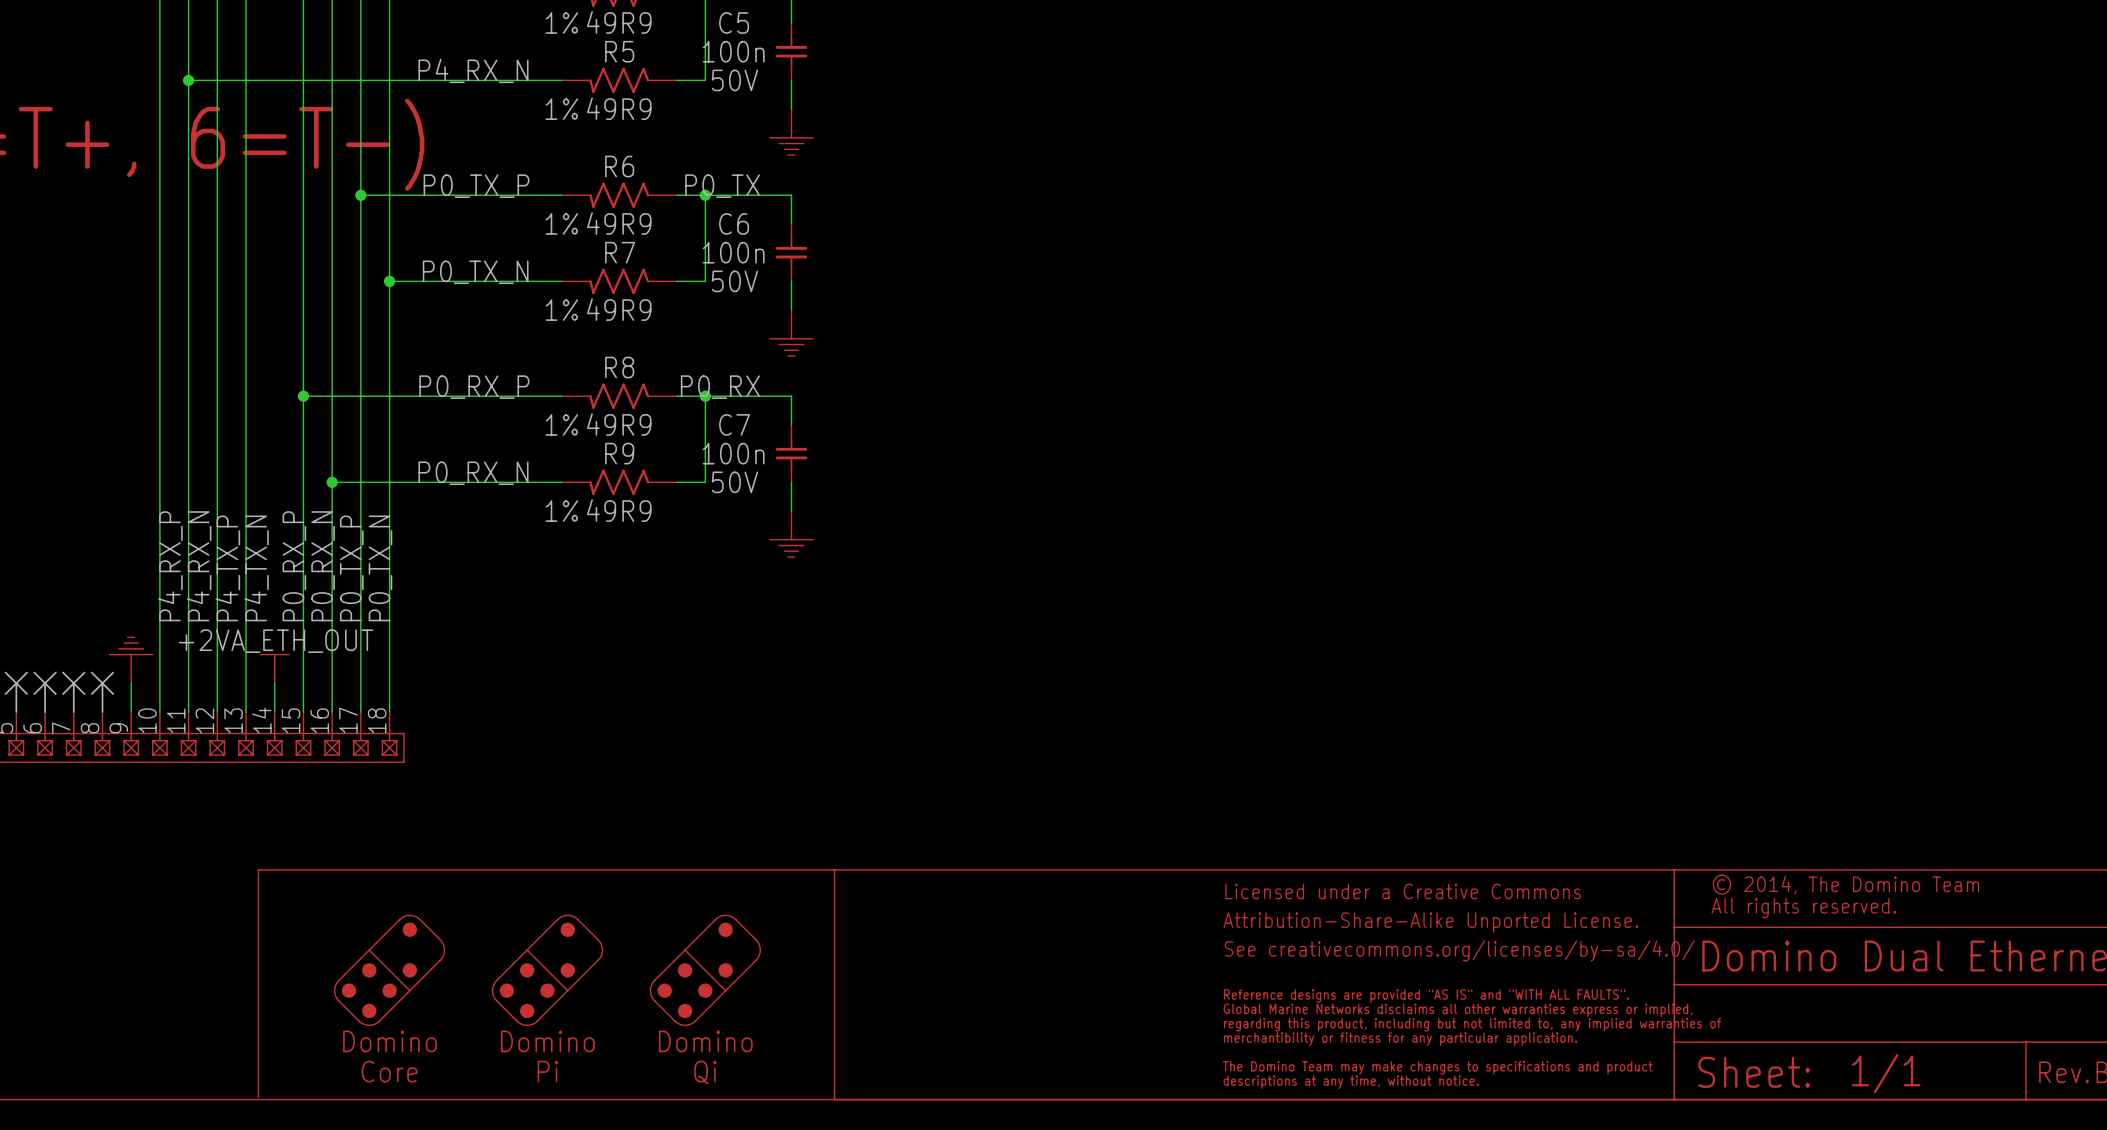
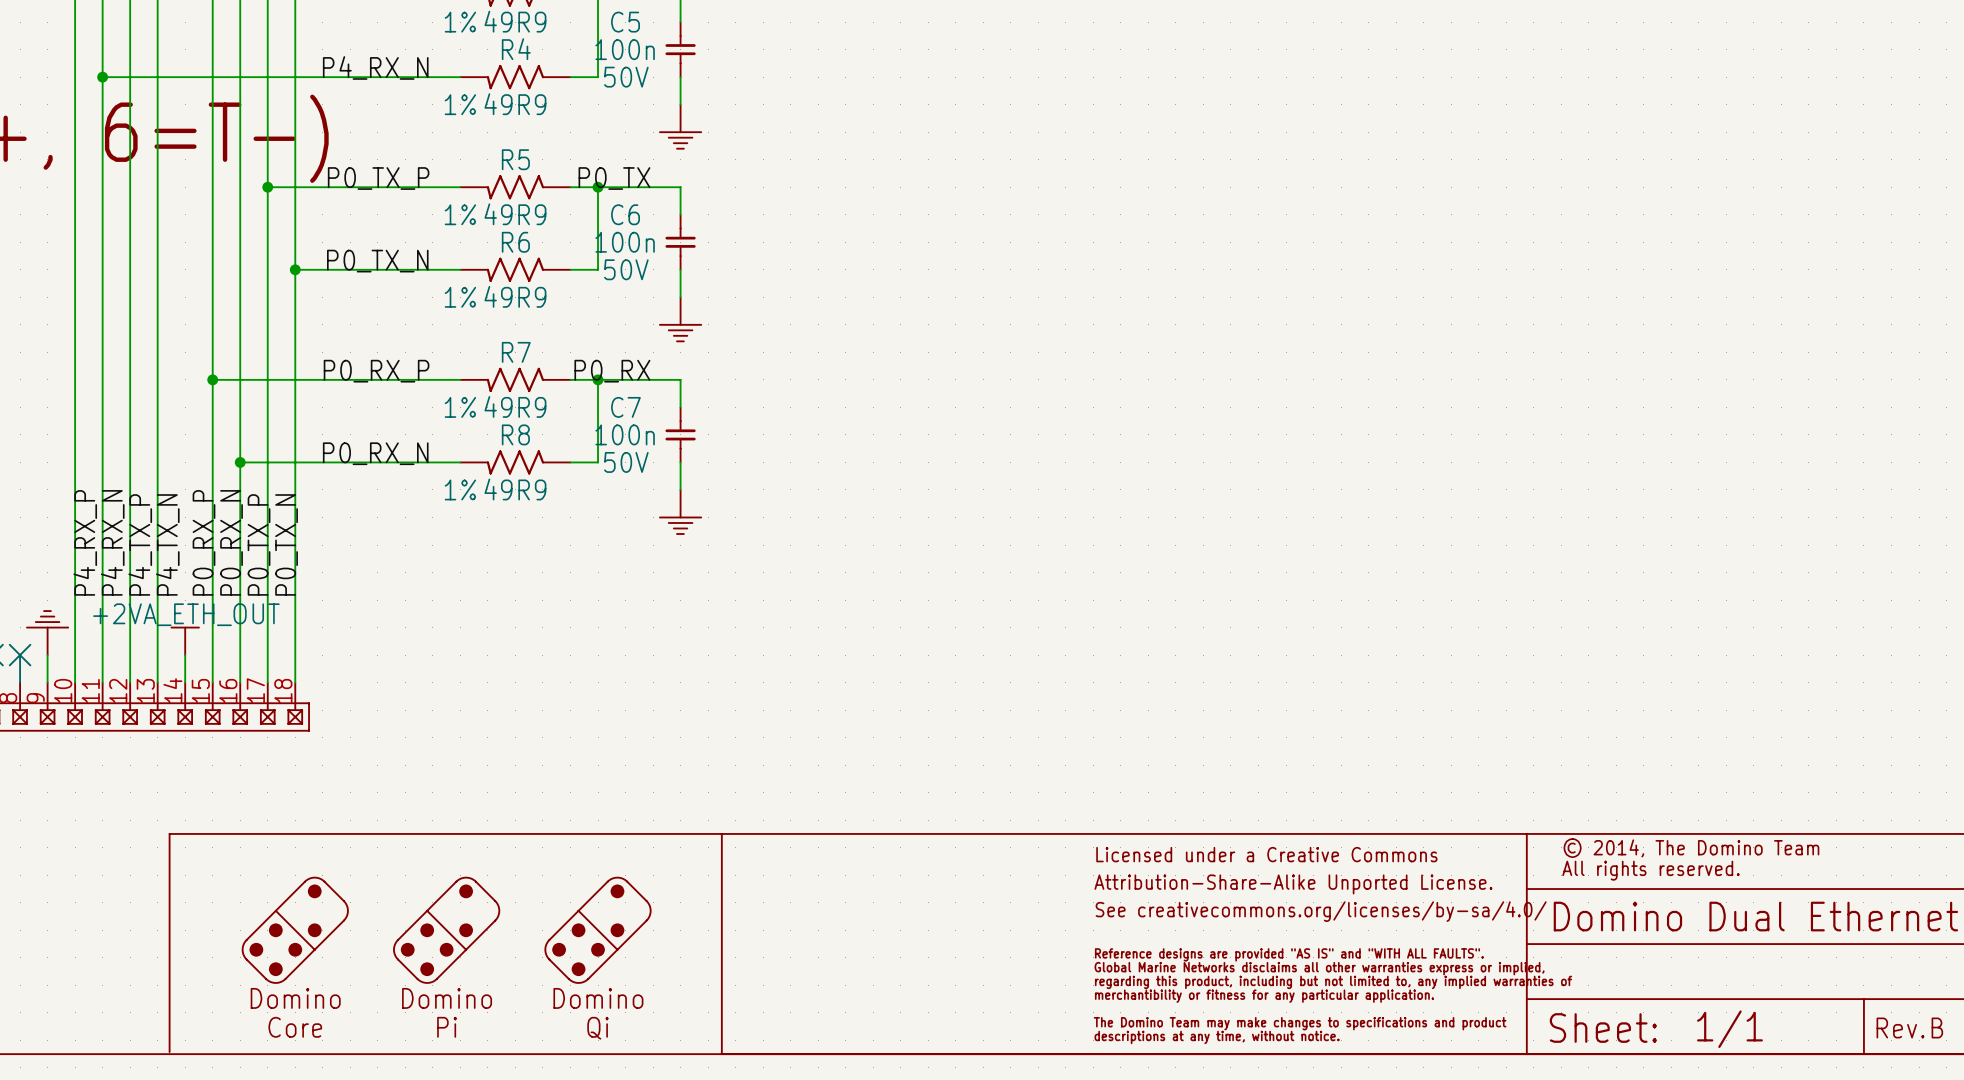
R5 name: R5 (619, 51) -> R4 (516, 49)
R6 name: R6 (619, 166) -> R5 (515, 159)
R7 name: R7 (620, 252) -> R6 (515, 242)
R8 name: R8 (619, 367) -> R7 (516, 352)
R9 name: R9 (619, 453) -> R8 (515, 434)

